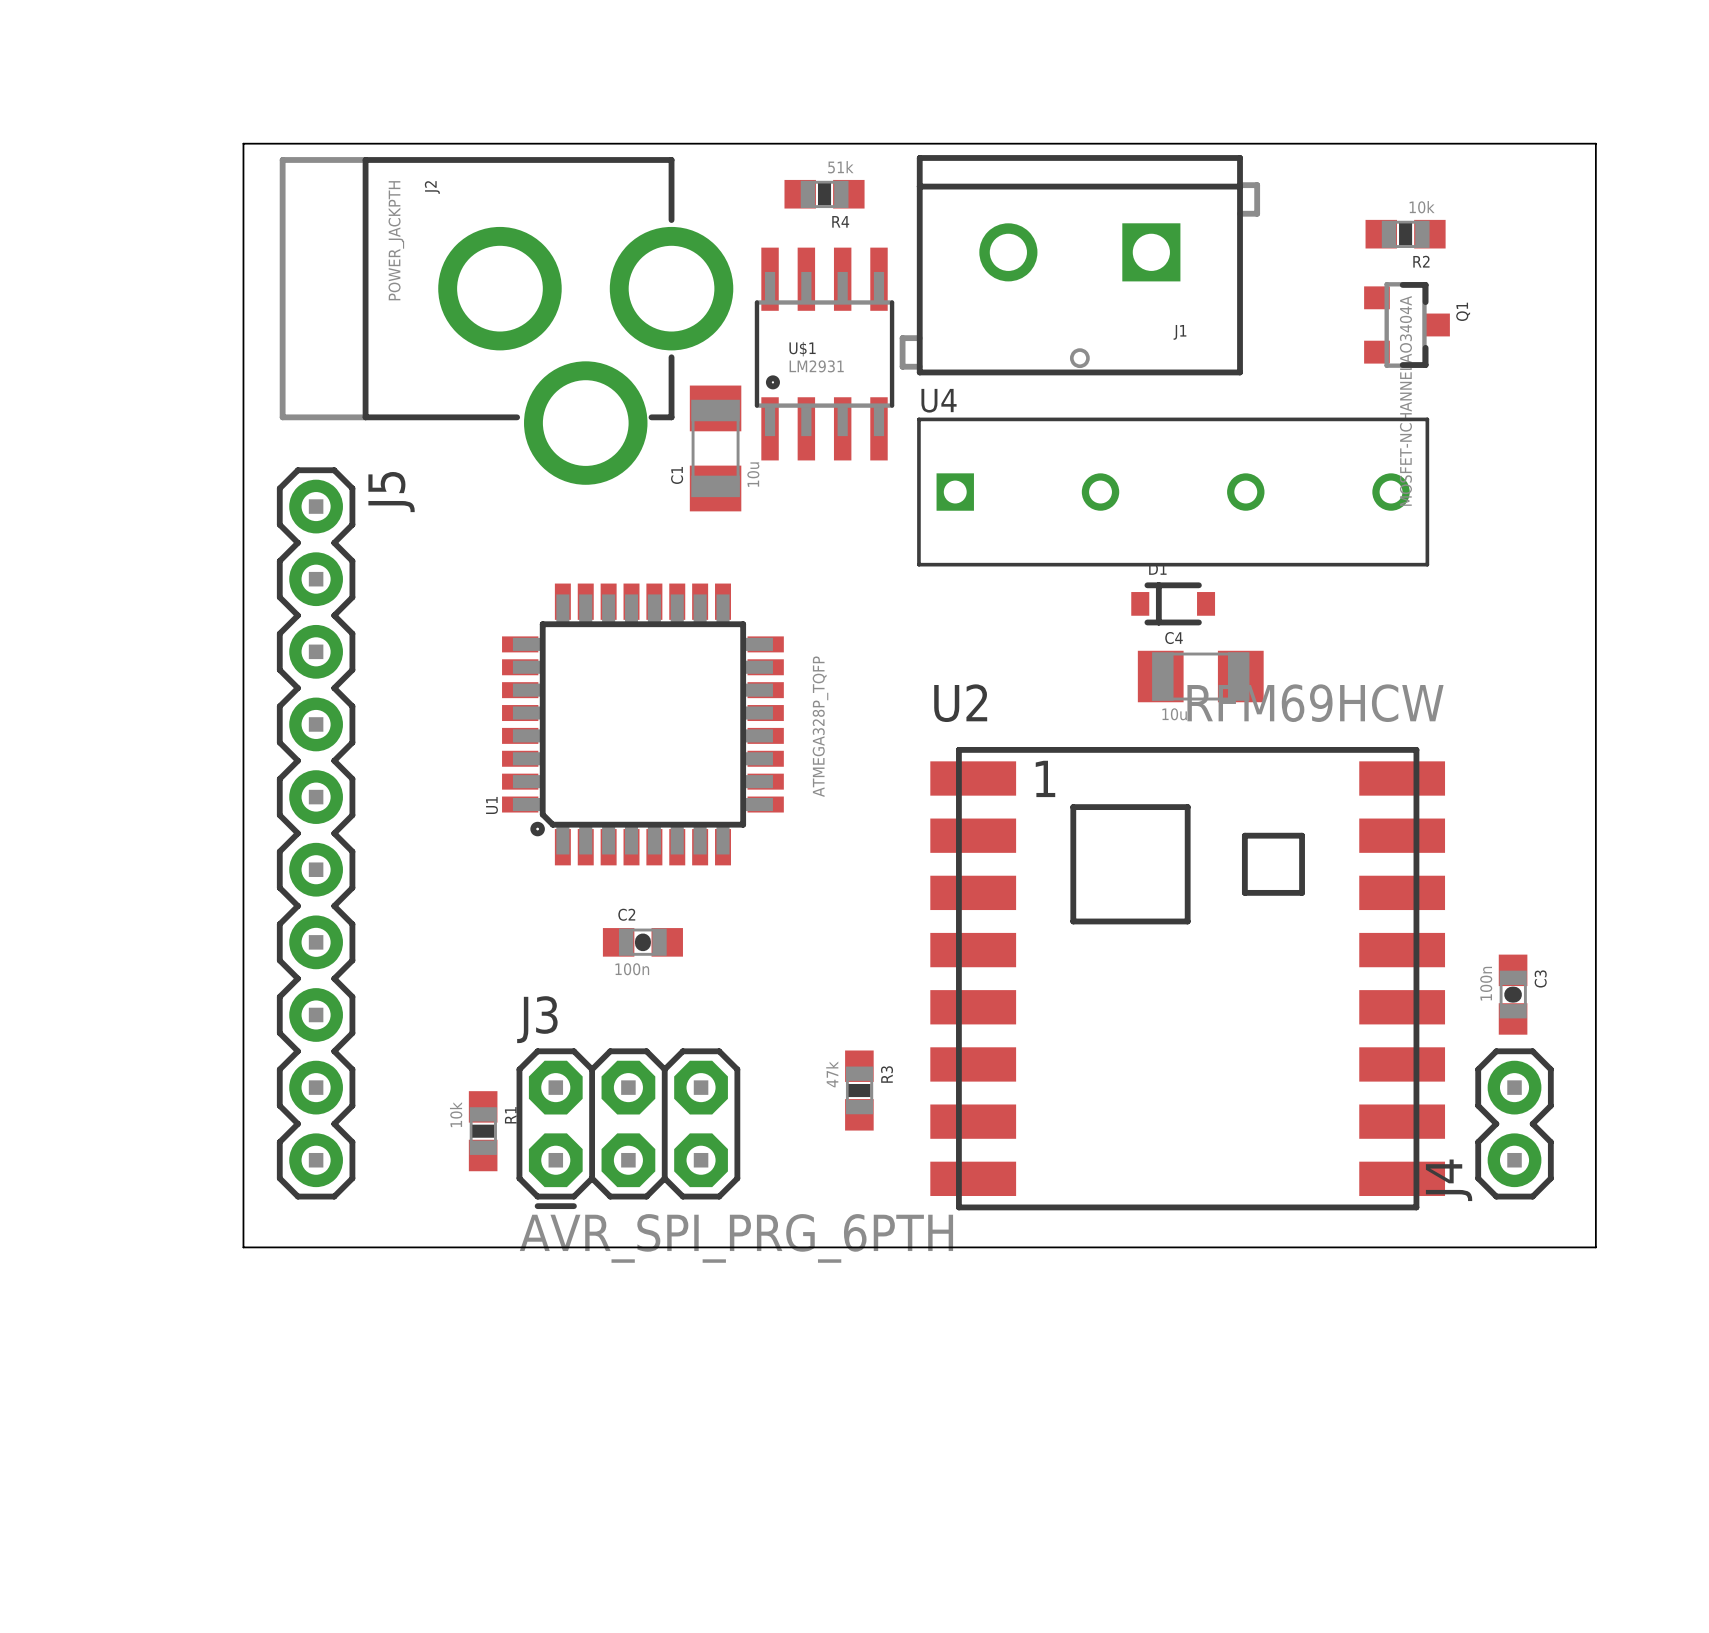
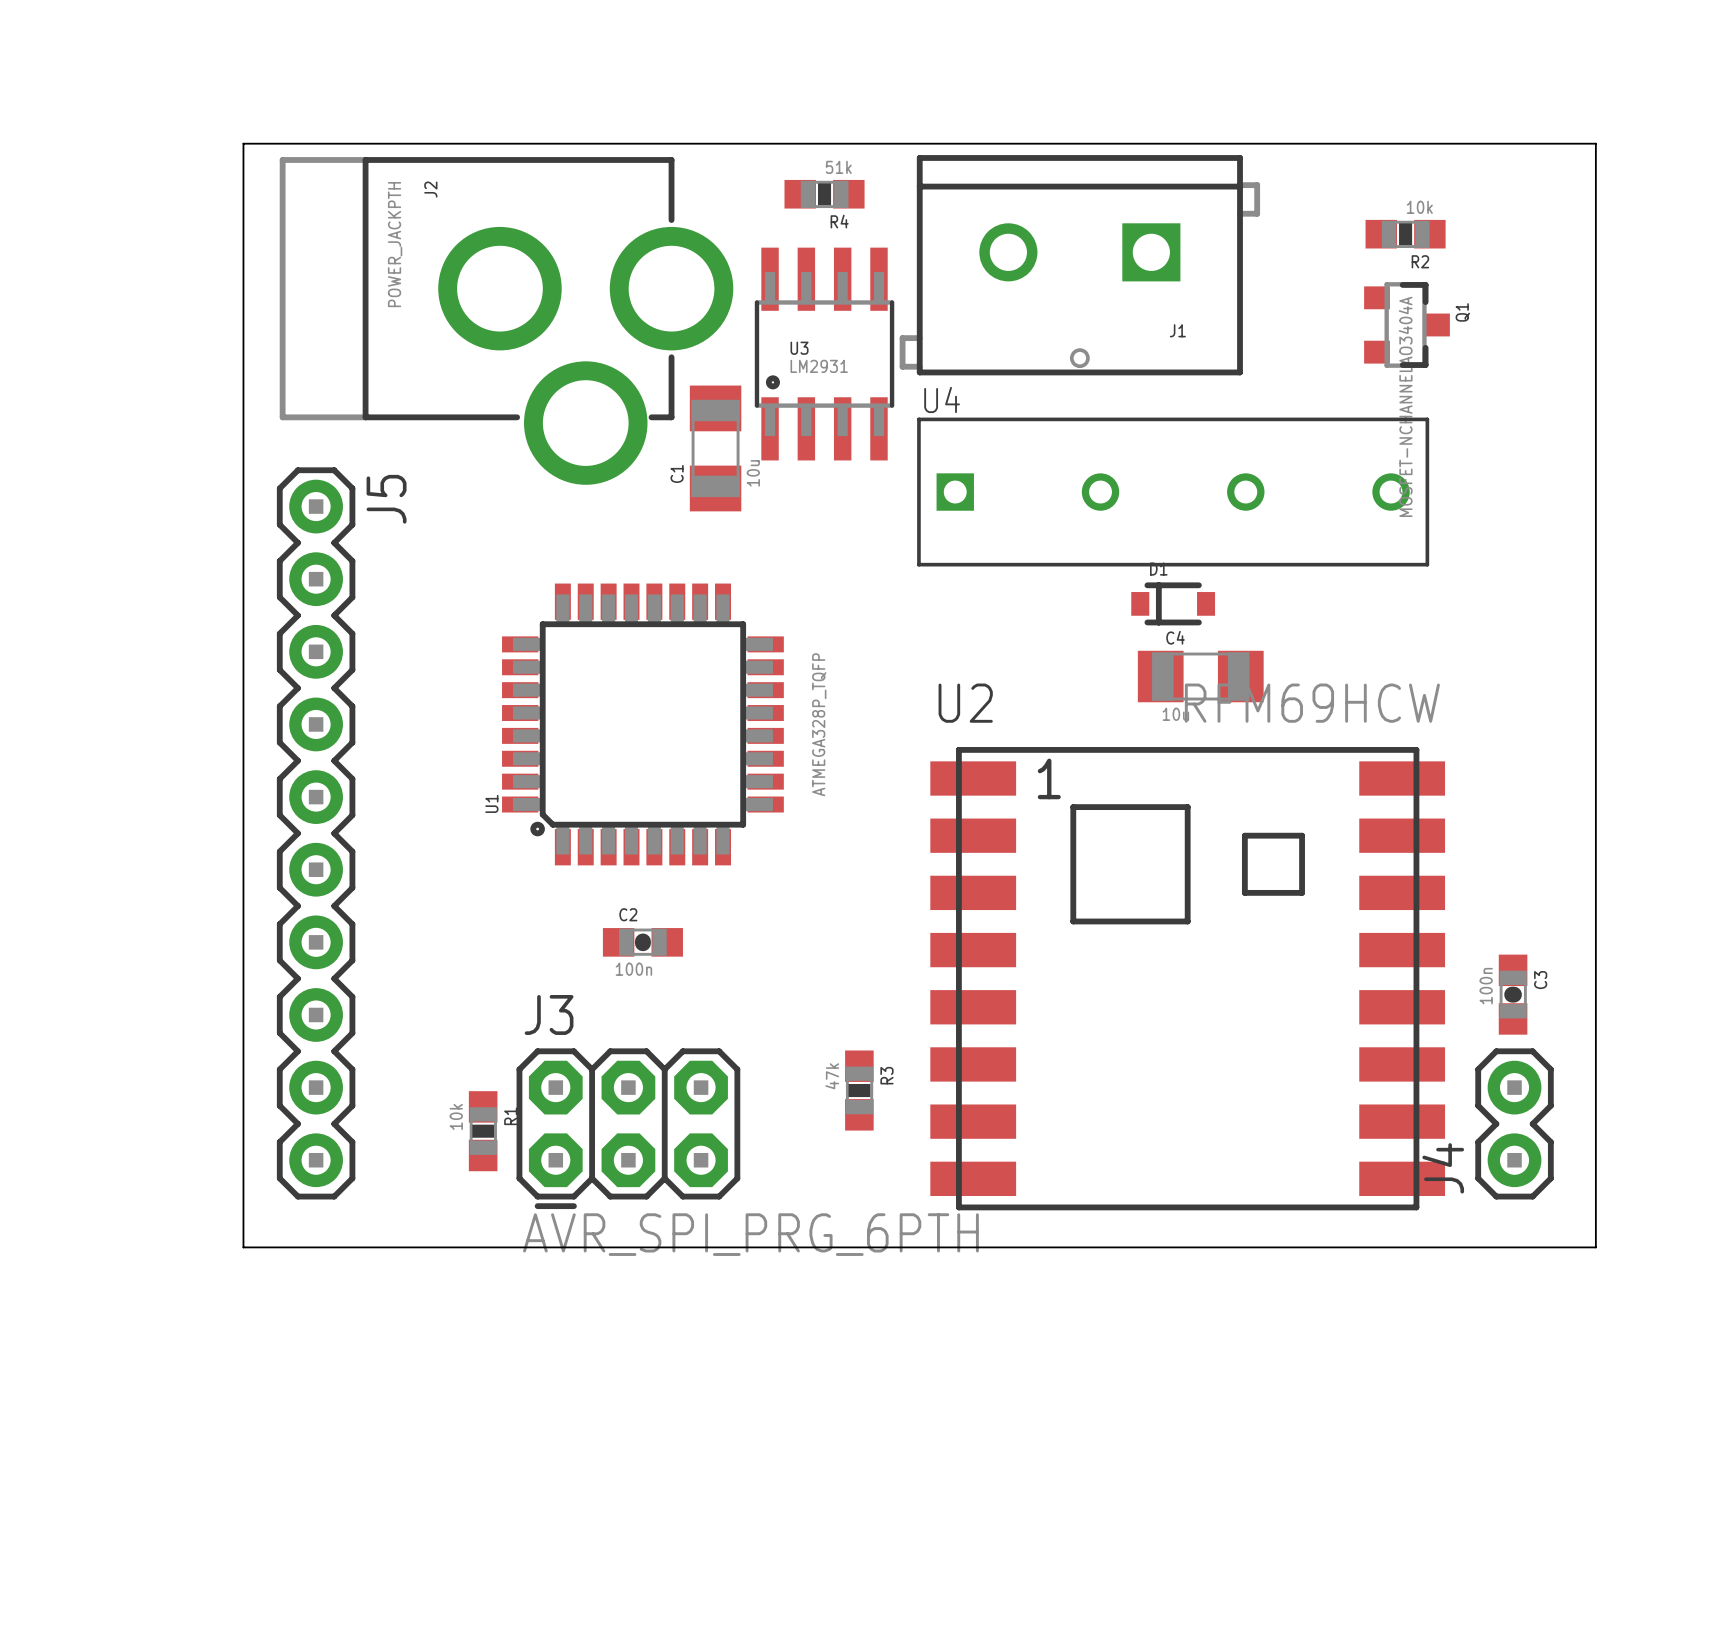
U$1 name: U$1 (802, 349) -> U3 (799, 348)

